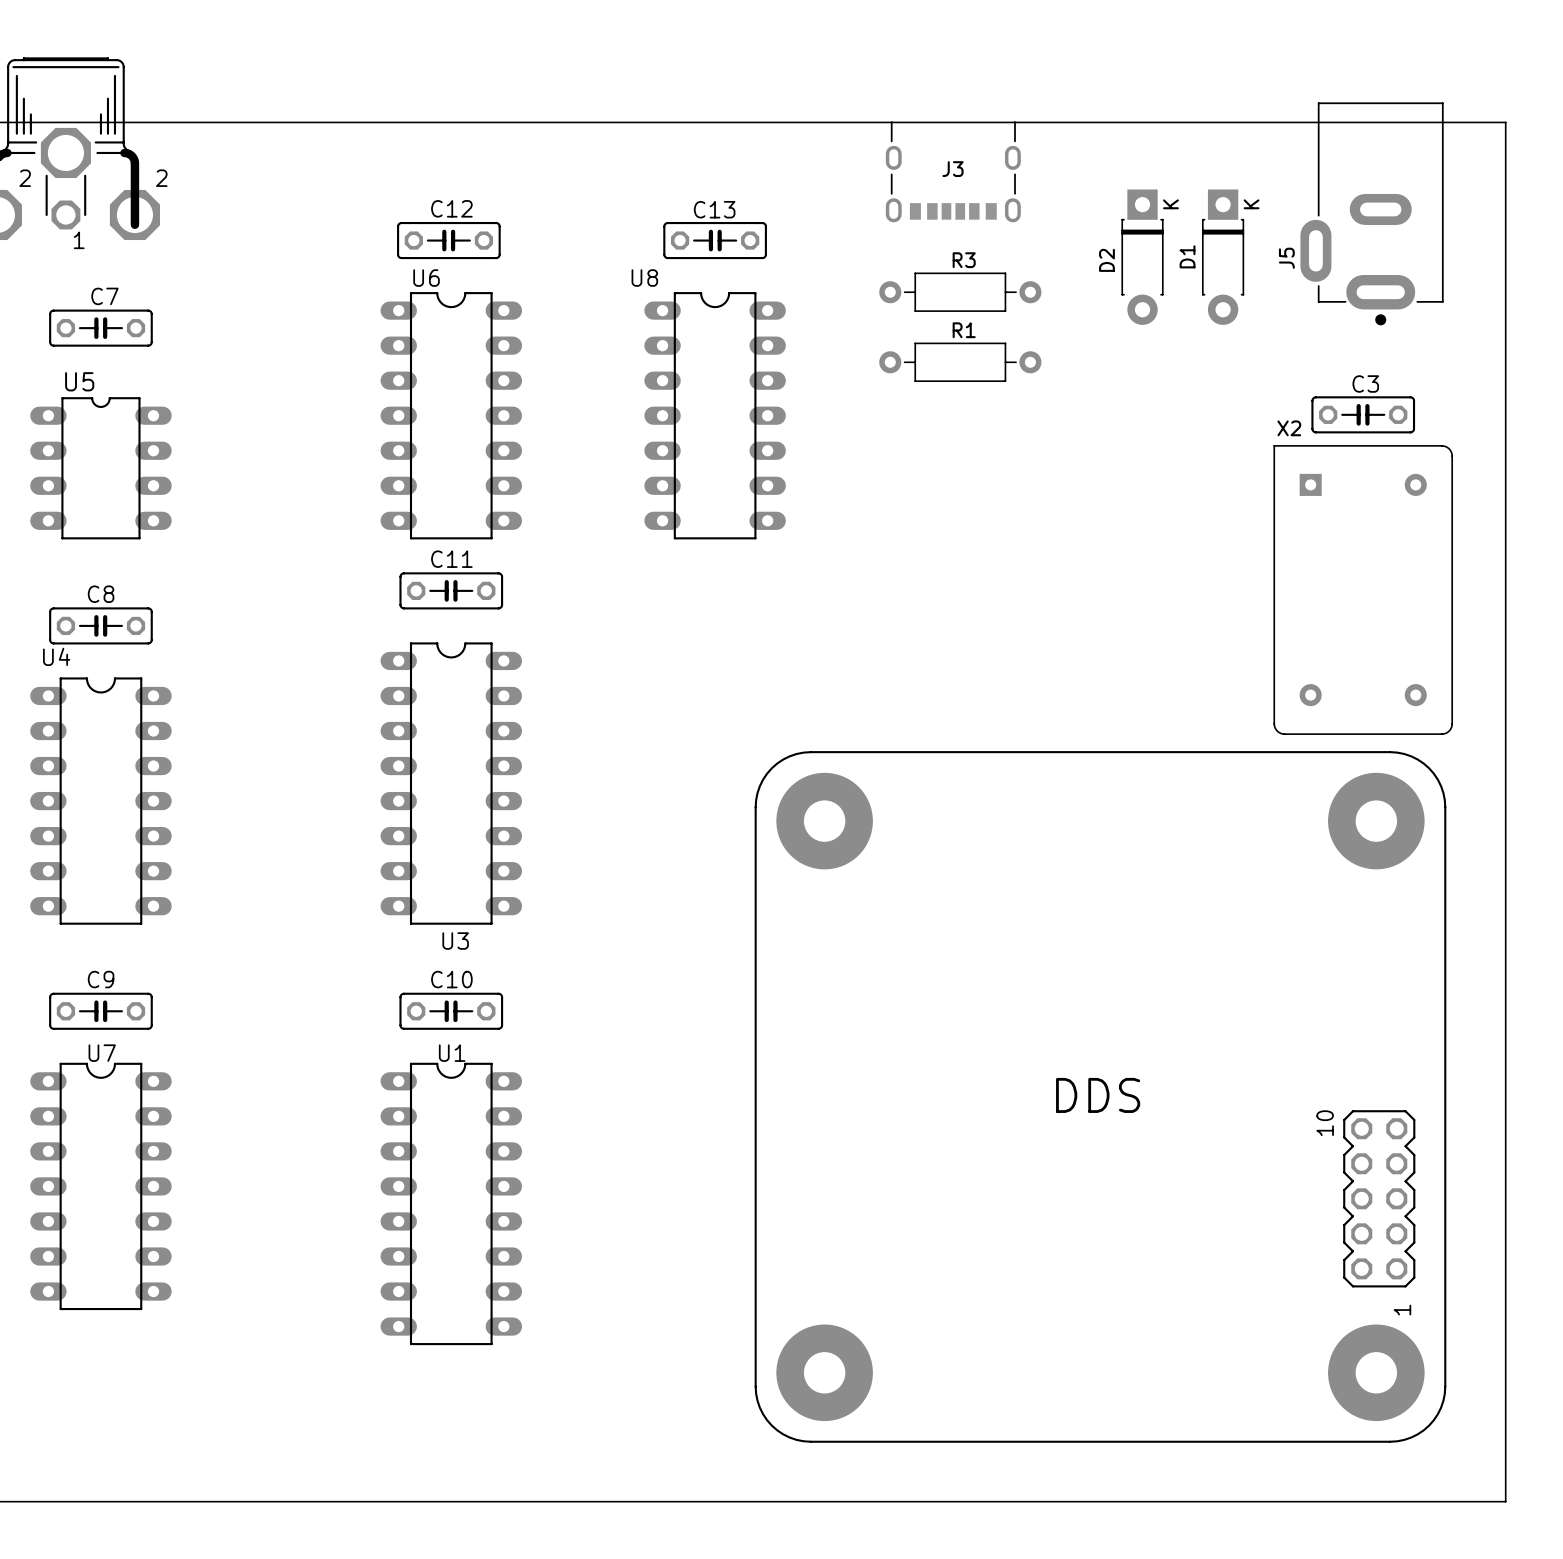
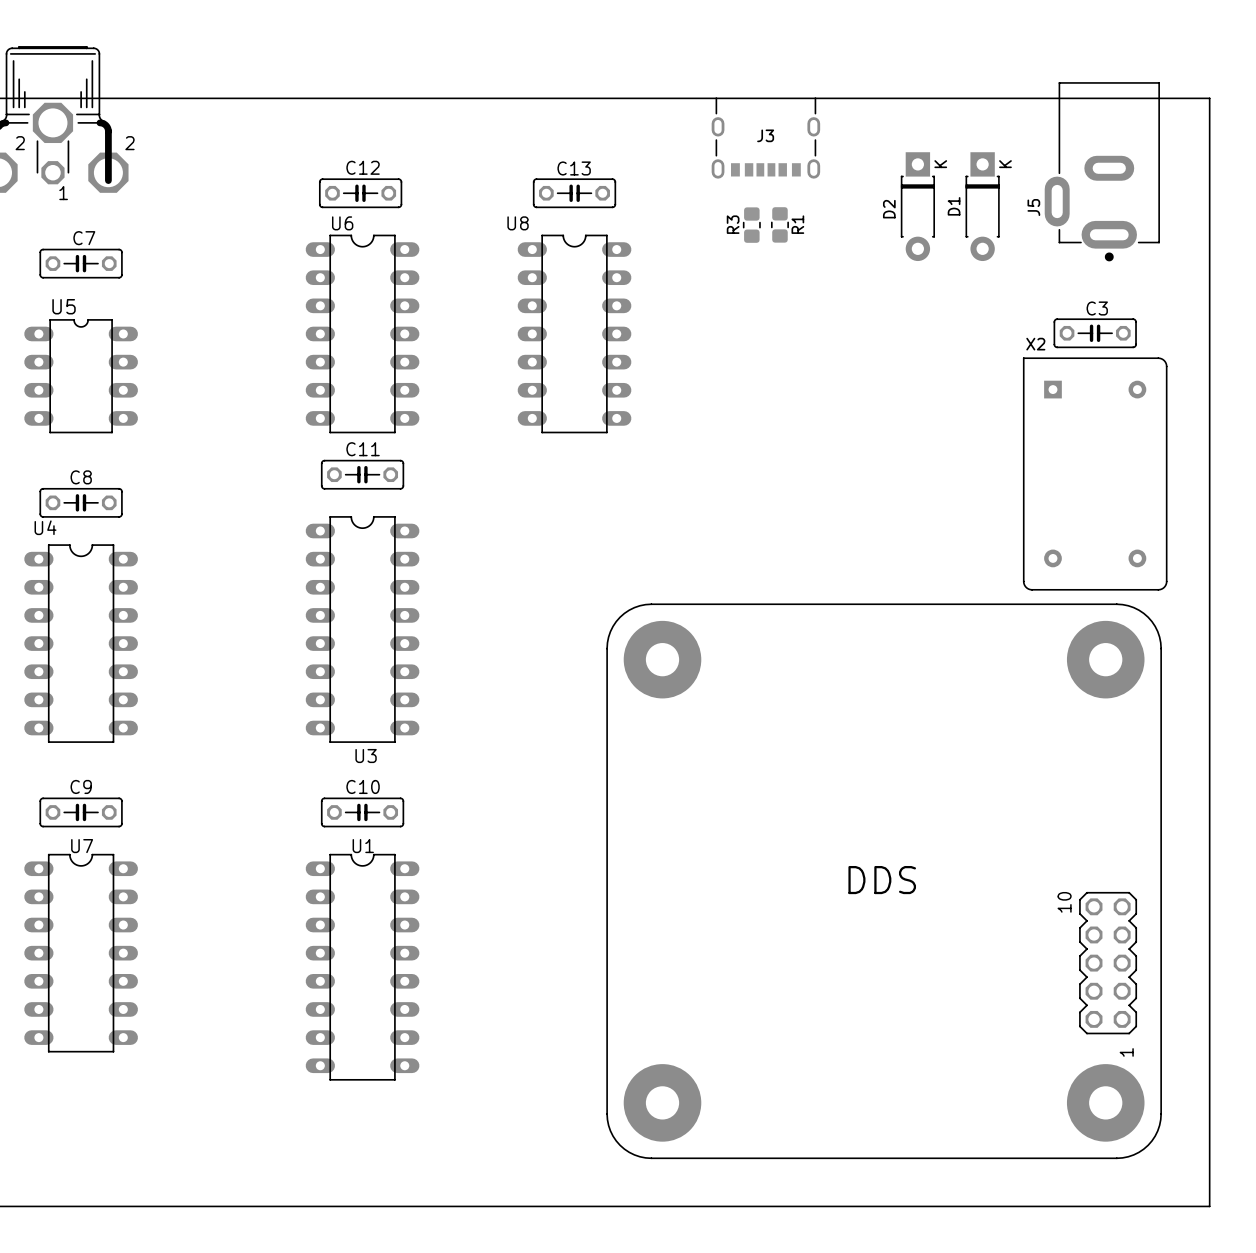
R3 name position: R3 (964, 260) -> R3 (733, 224)
R3 footprint: [879, 272, 1042, 312] -> [743, 207, 761, 243]
R1 name position: R1 (964, 330) -> R1 (797, 224)
R1 footprint: [879, 342, 1042, 383] -> [771, 207, 789, 243]

